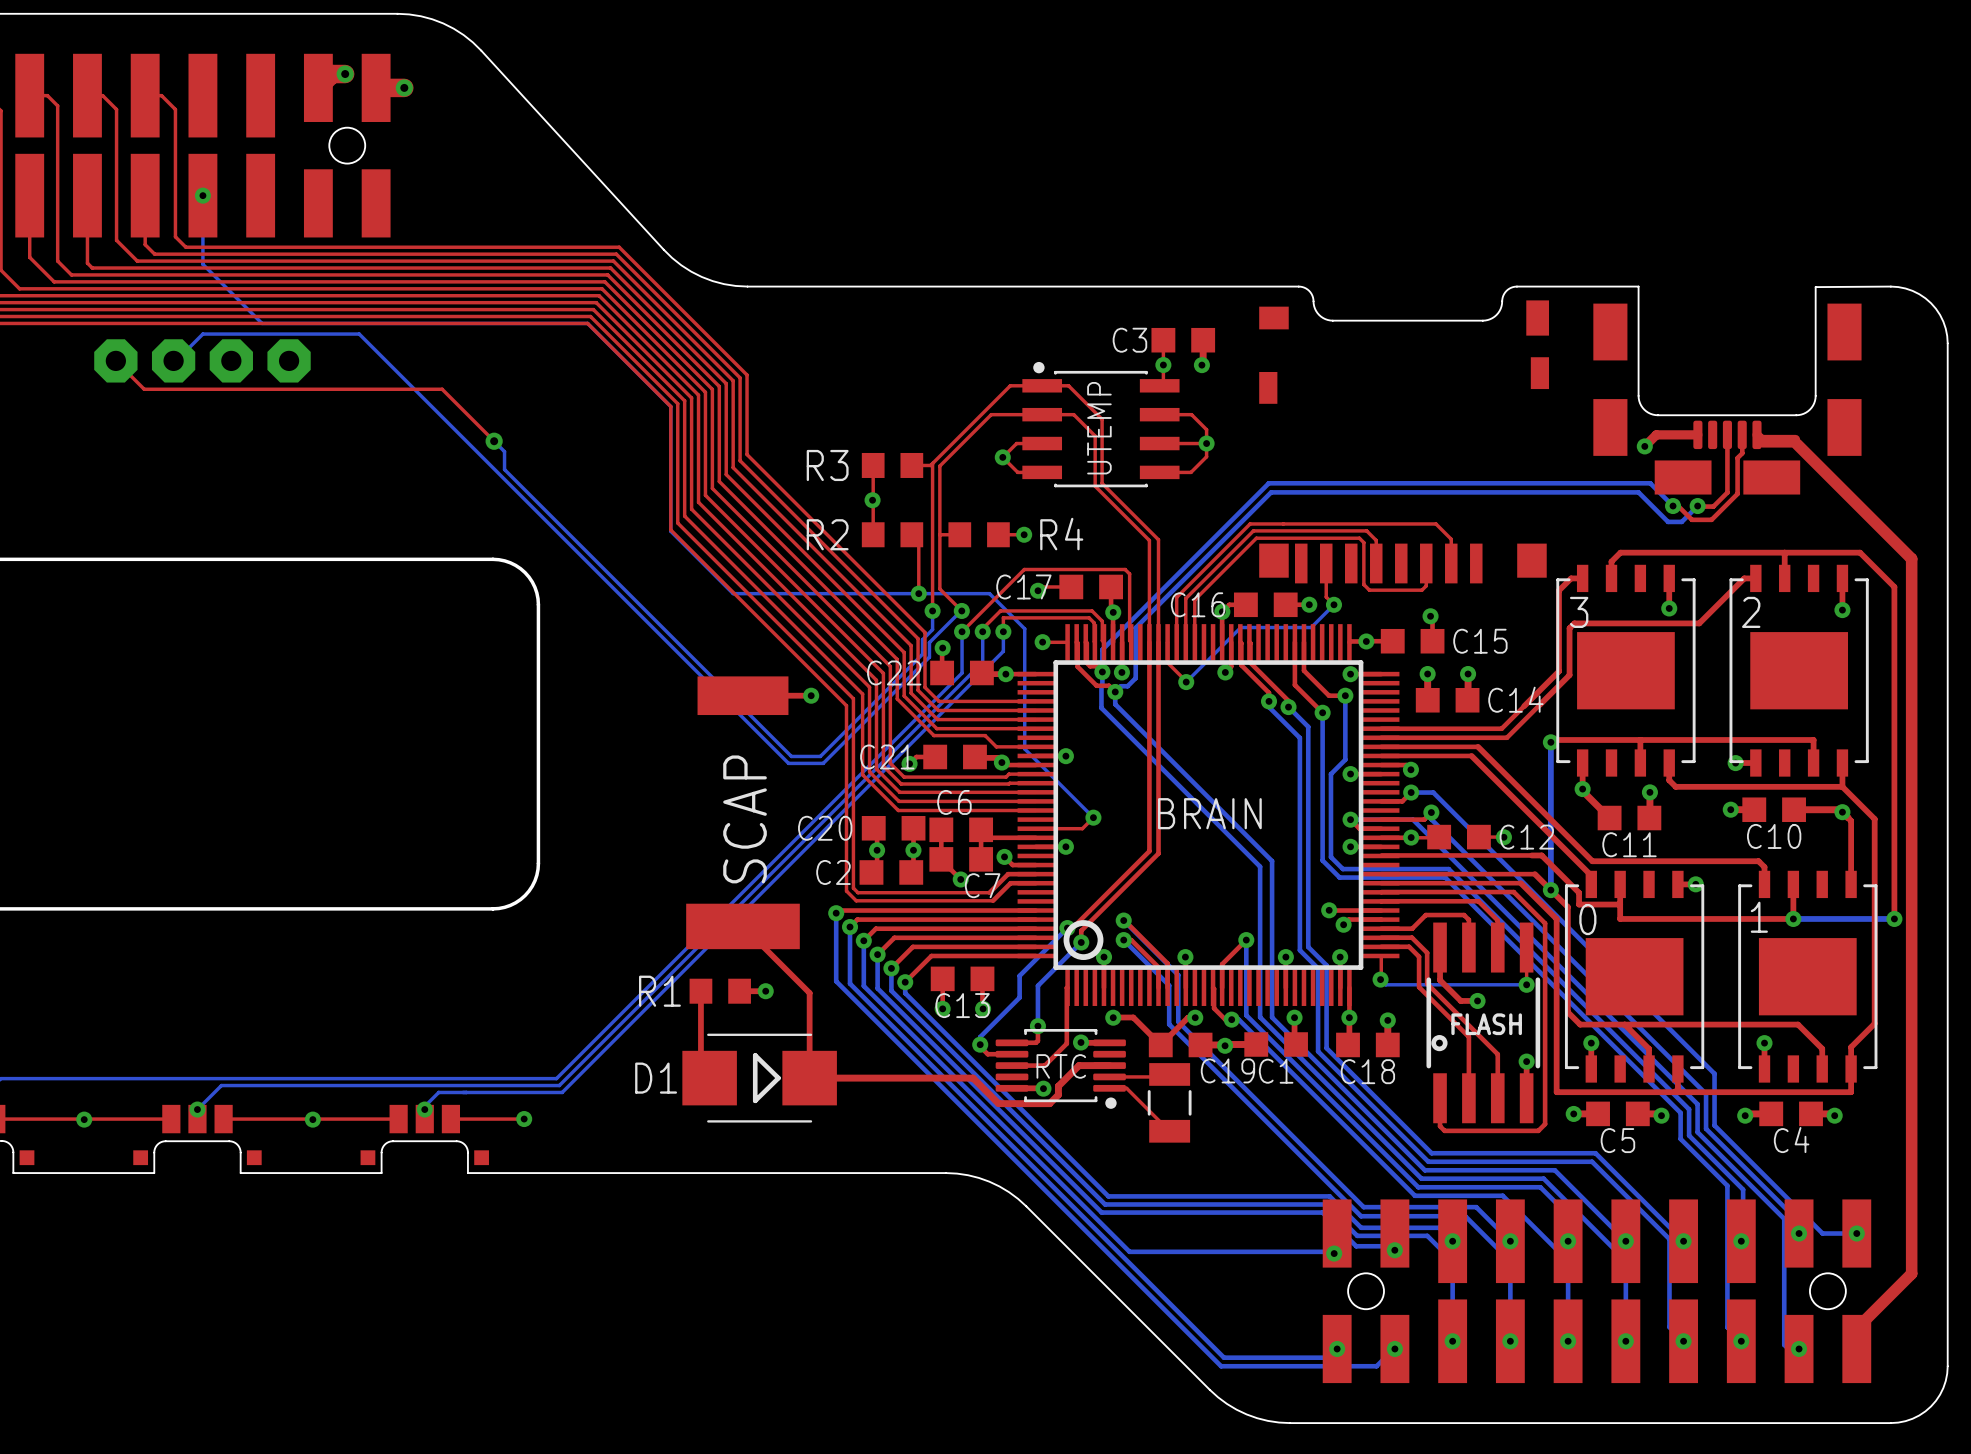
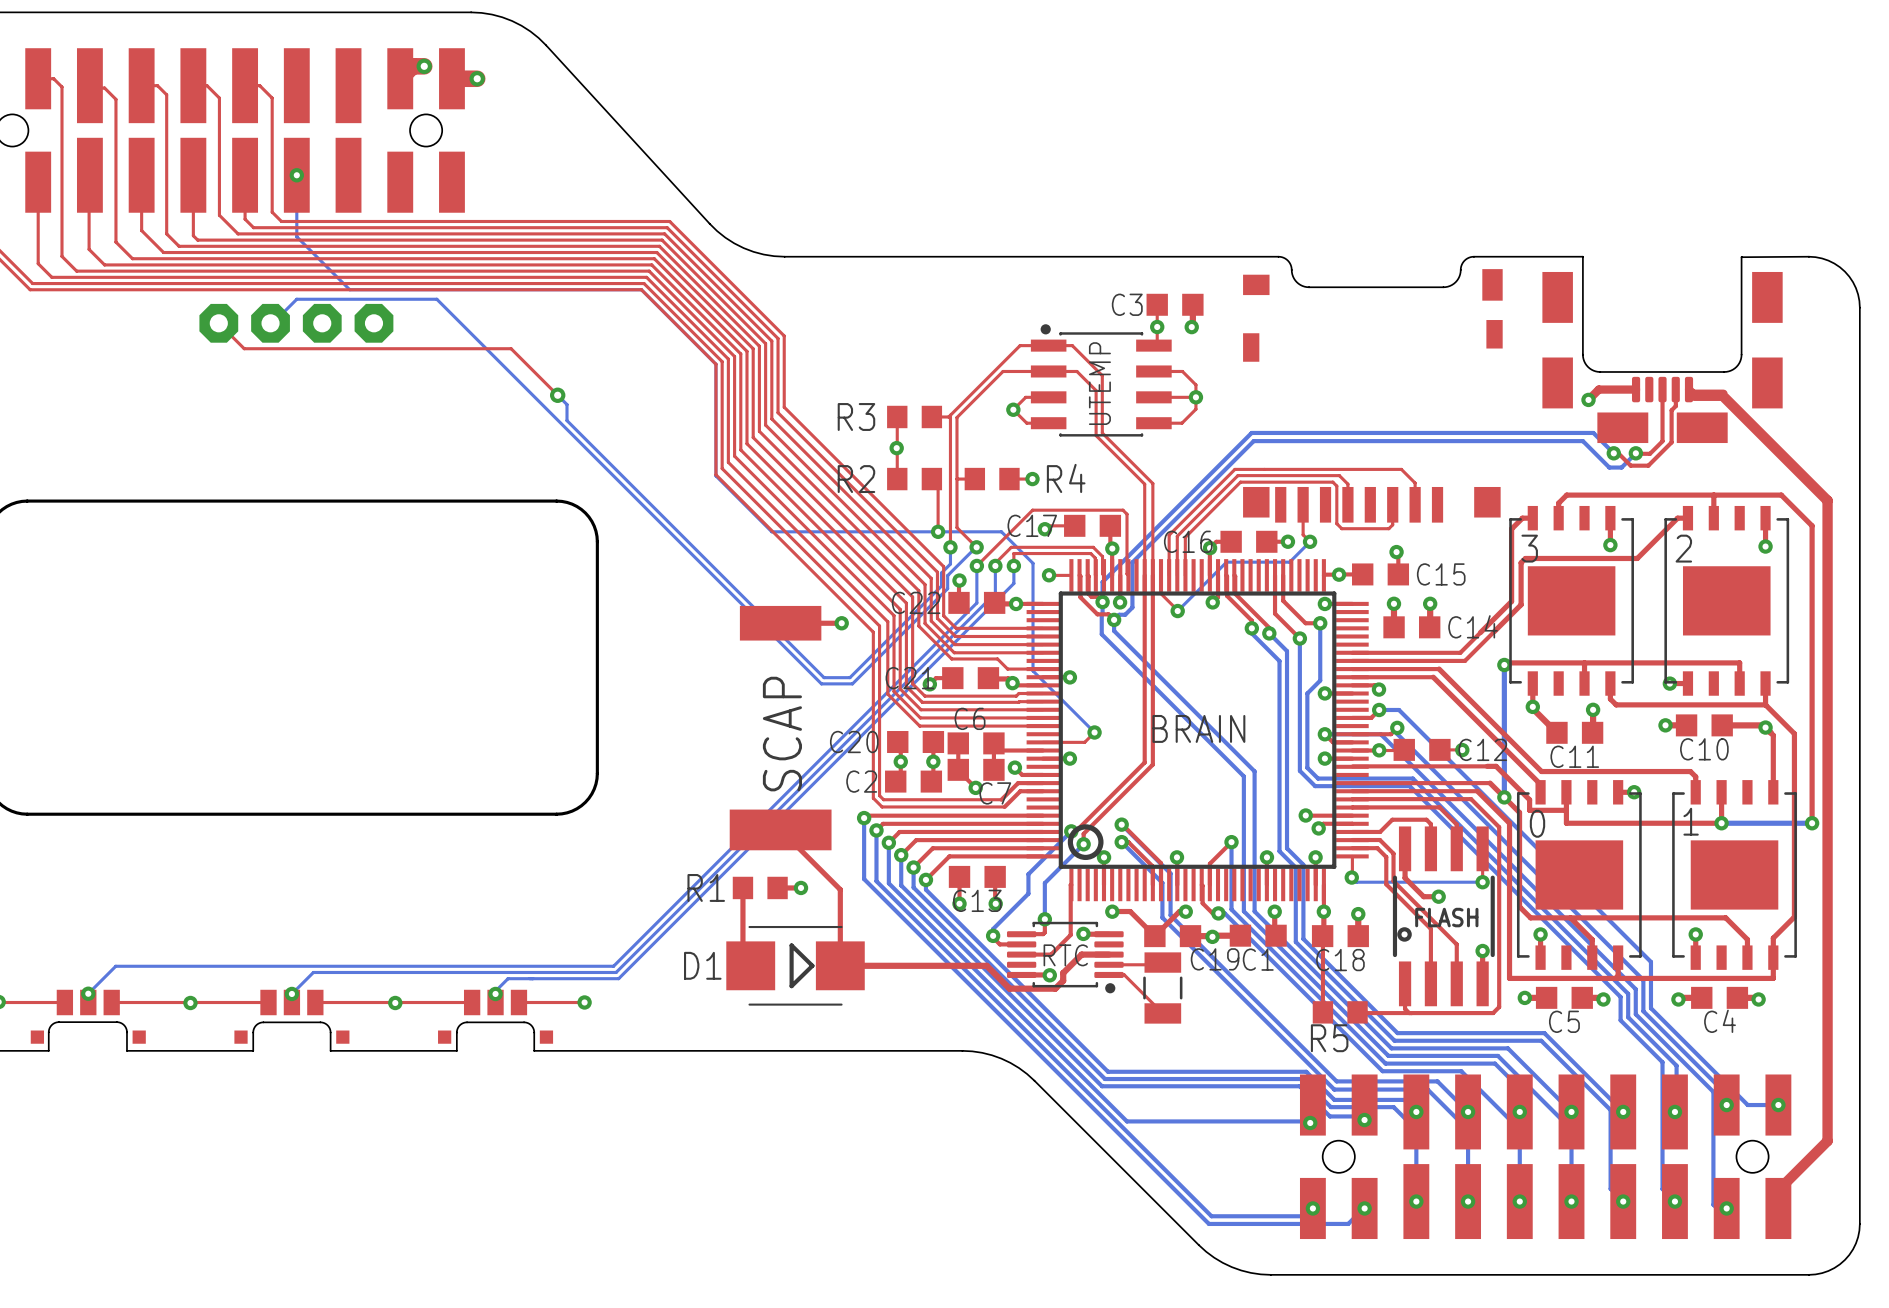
top track: none -> (1322, 936) (1322, 1012)
R5: none -> (1340, 1012)
top track: none -> (1357, 1012) (1411, 1013)

